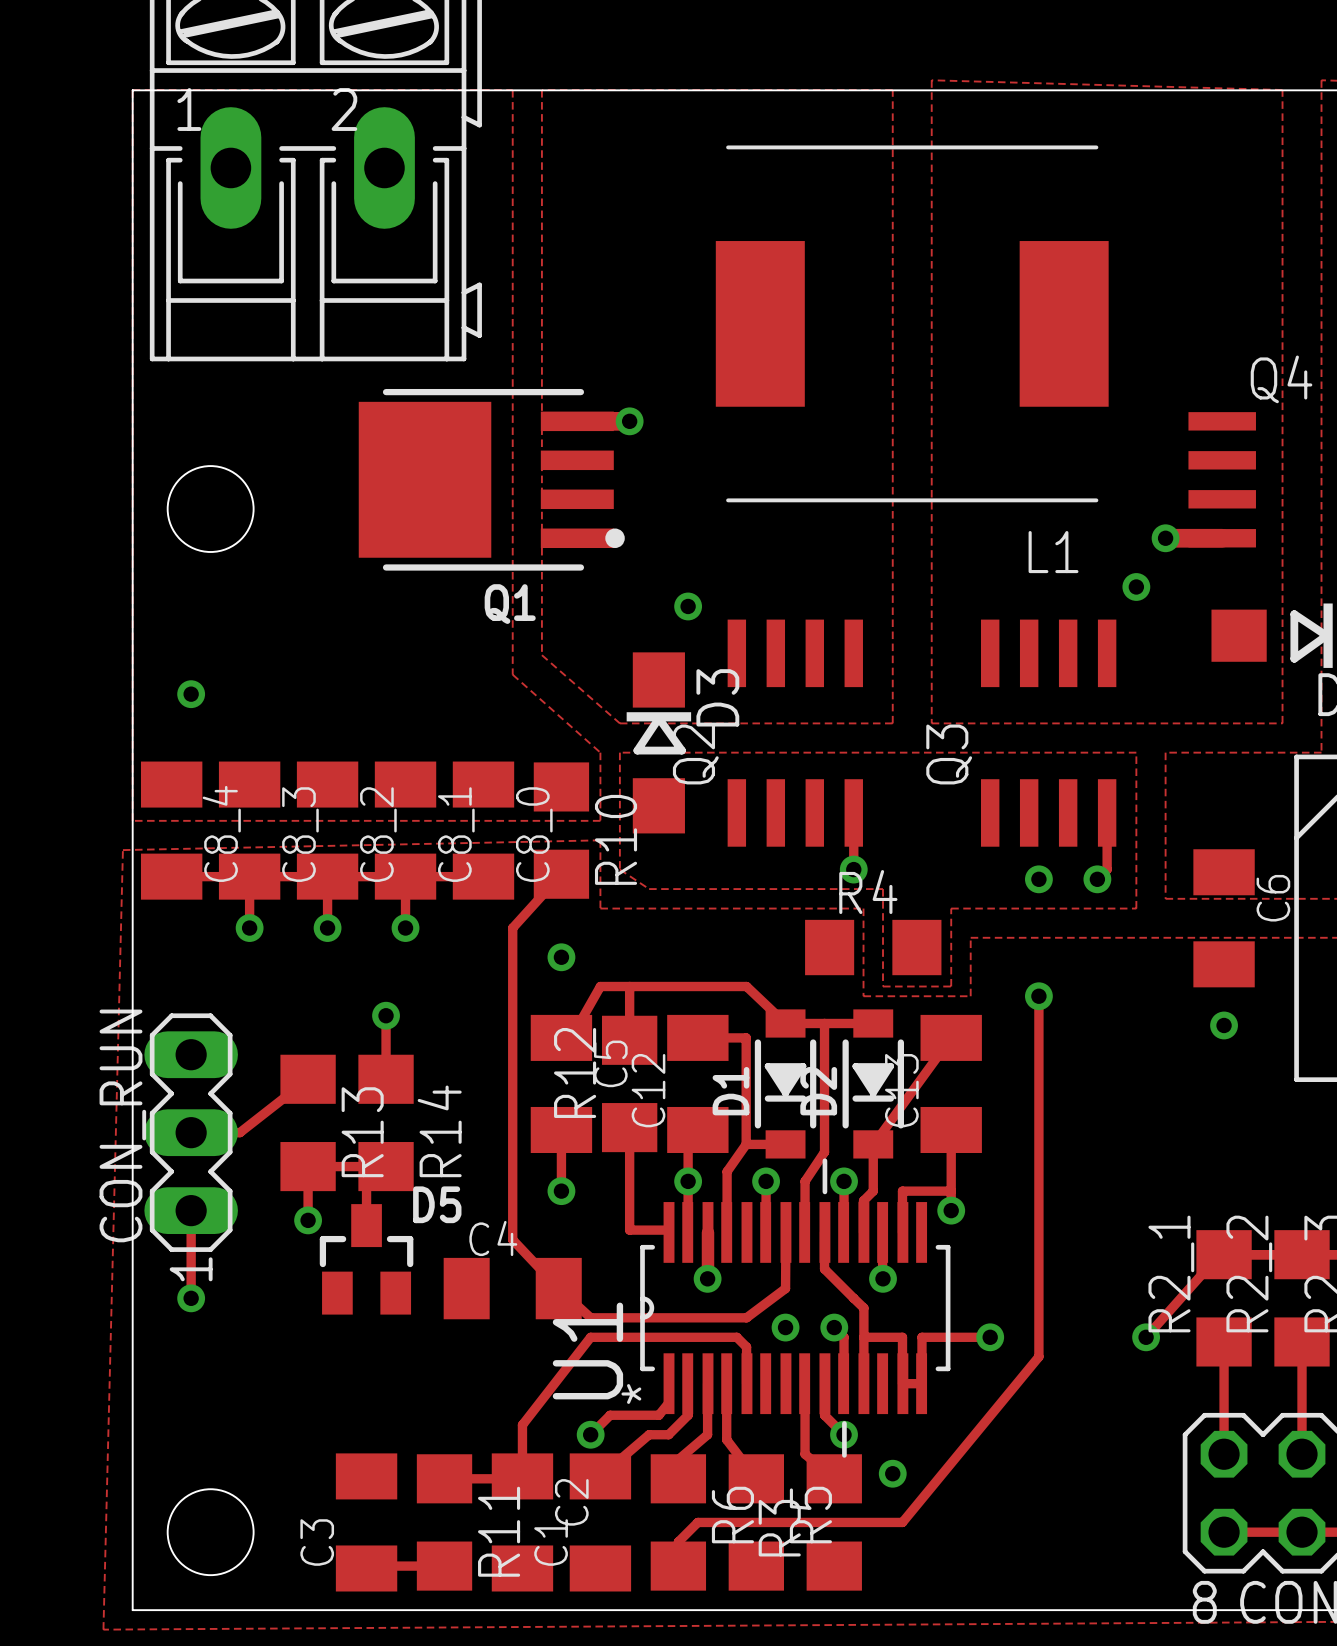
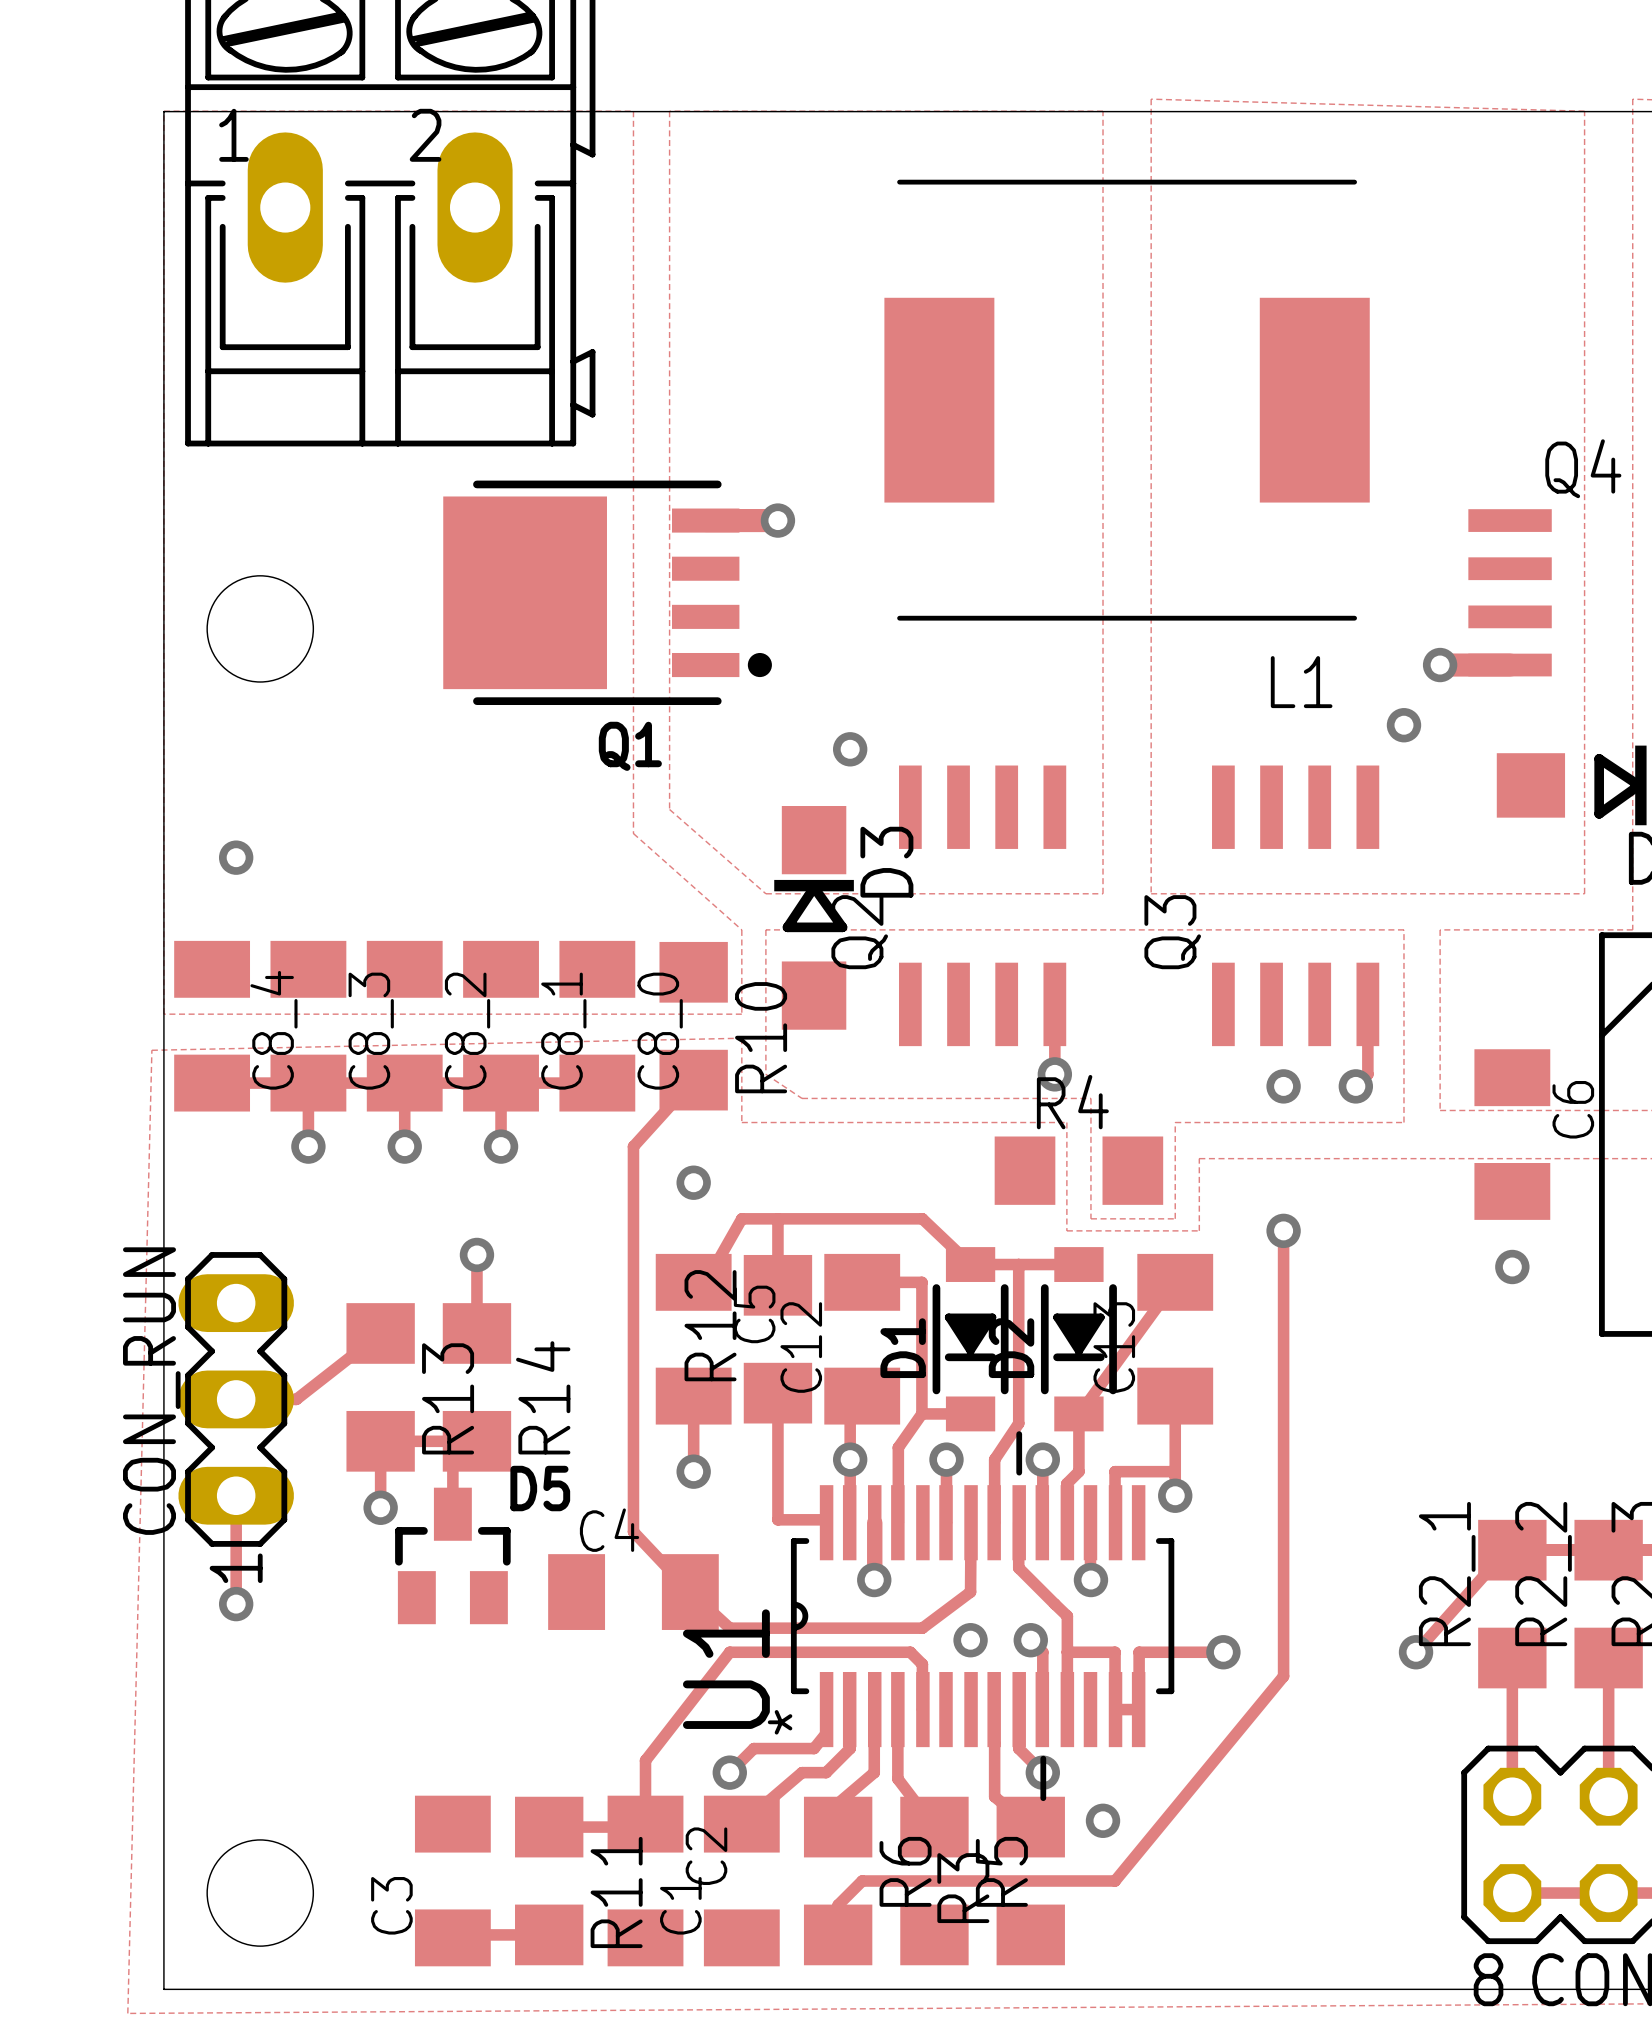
Q1 footprint: [358, 388, 625, 571] -> [443, 480, 772, 706]

